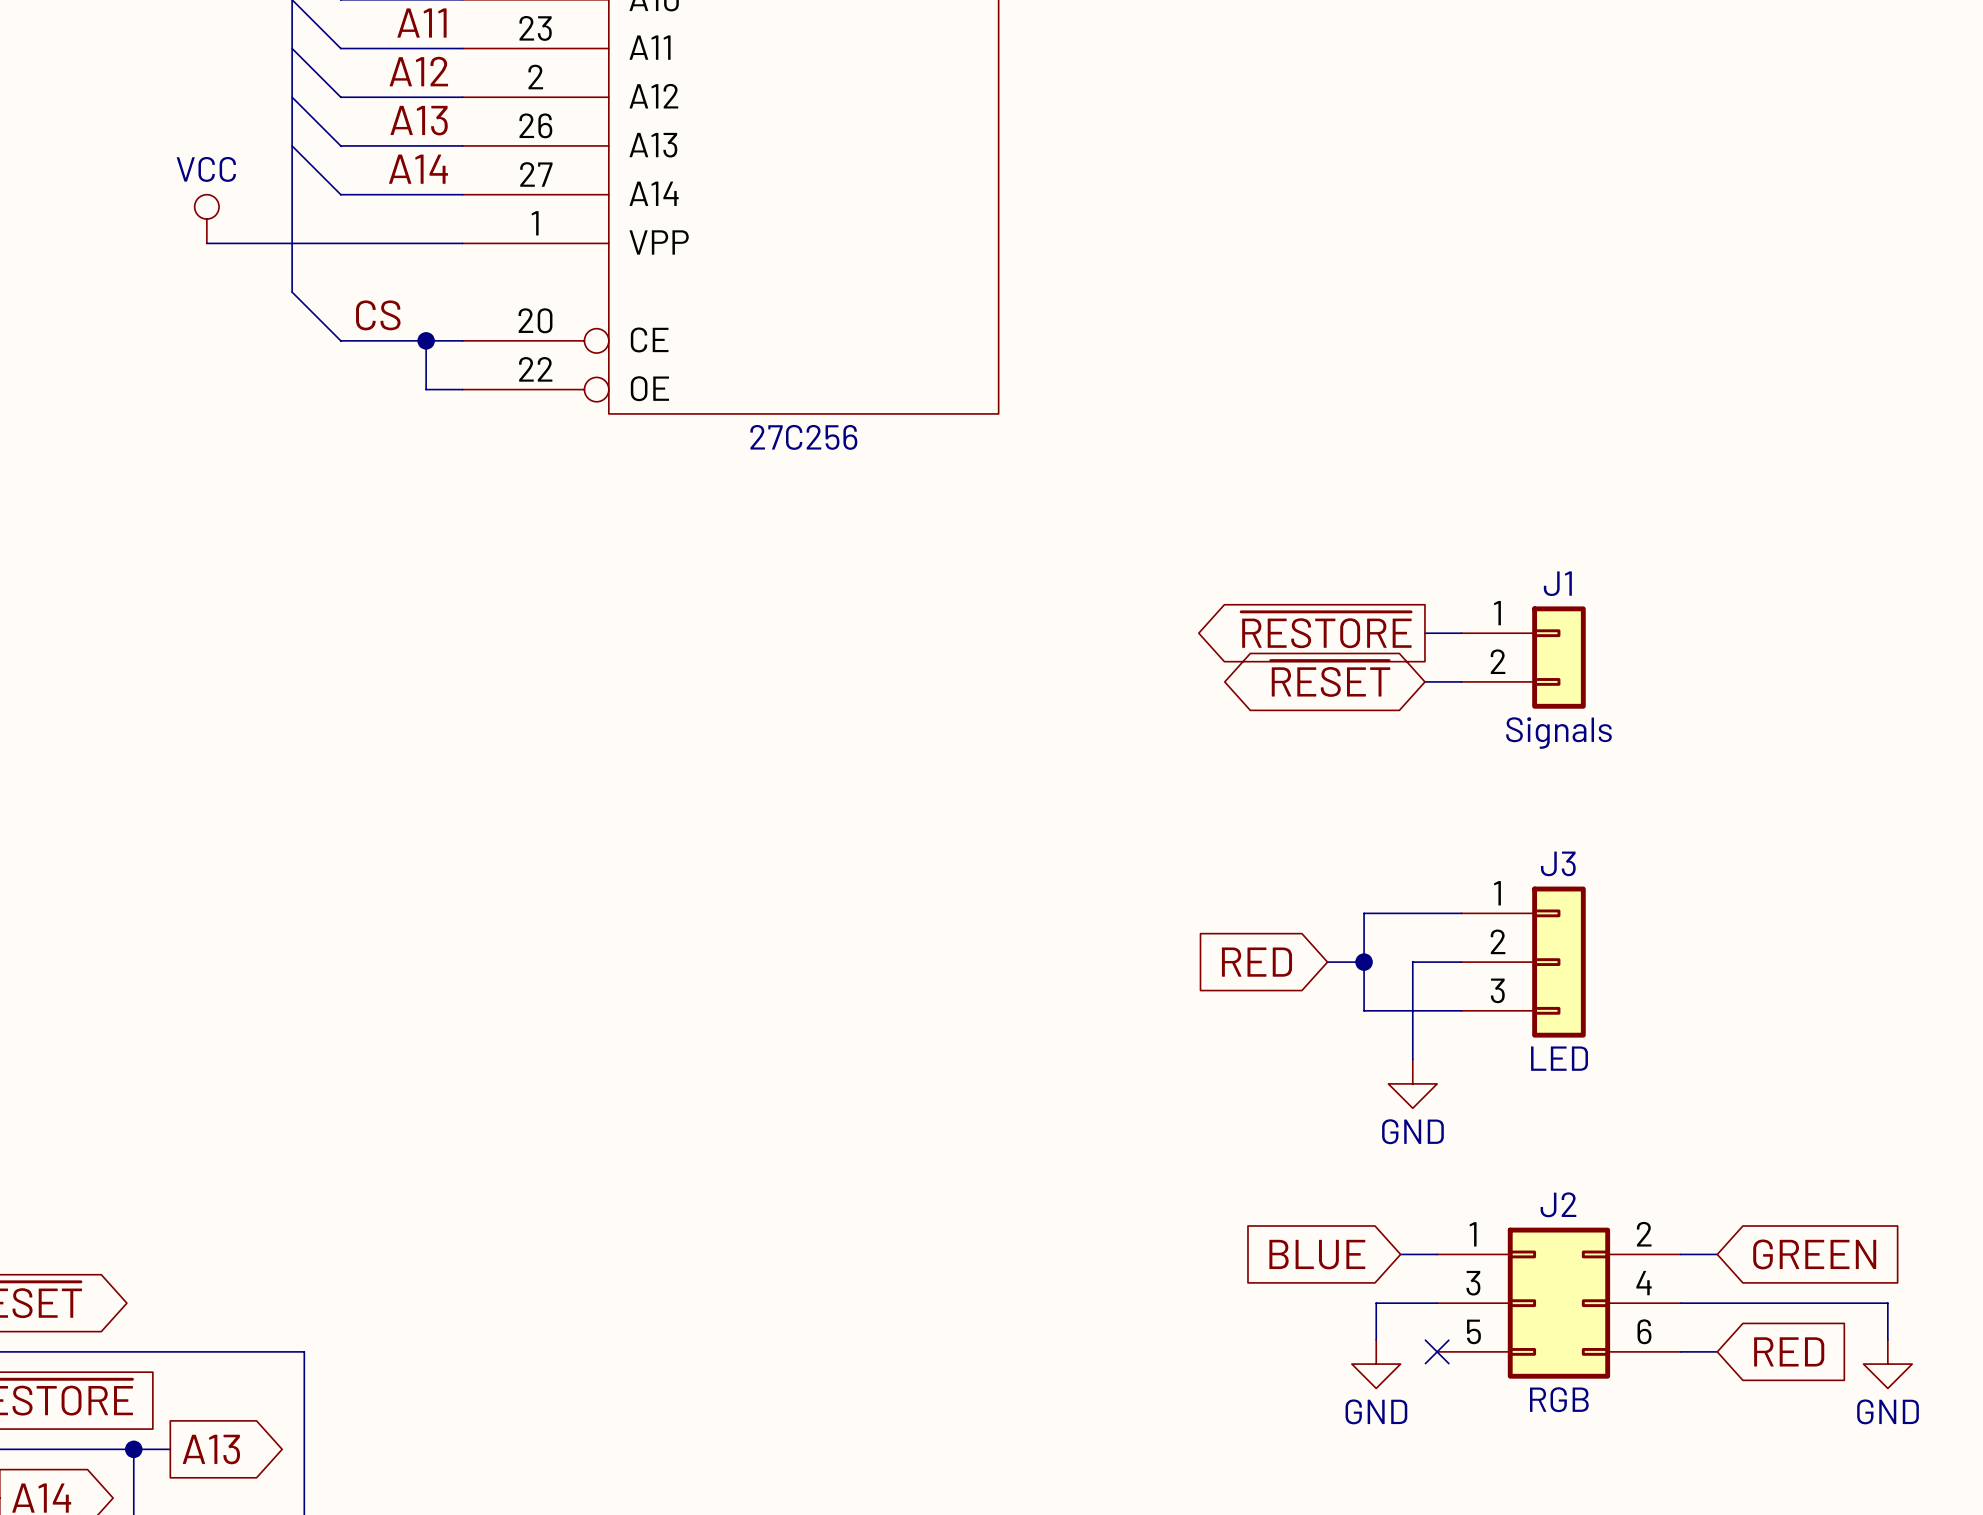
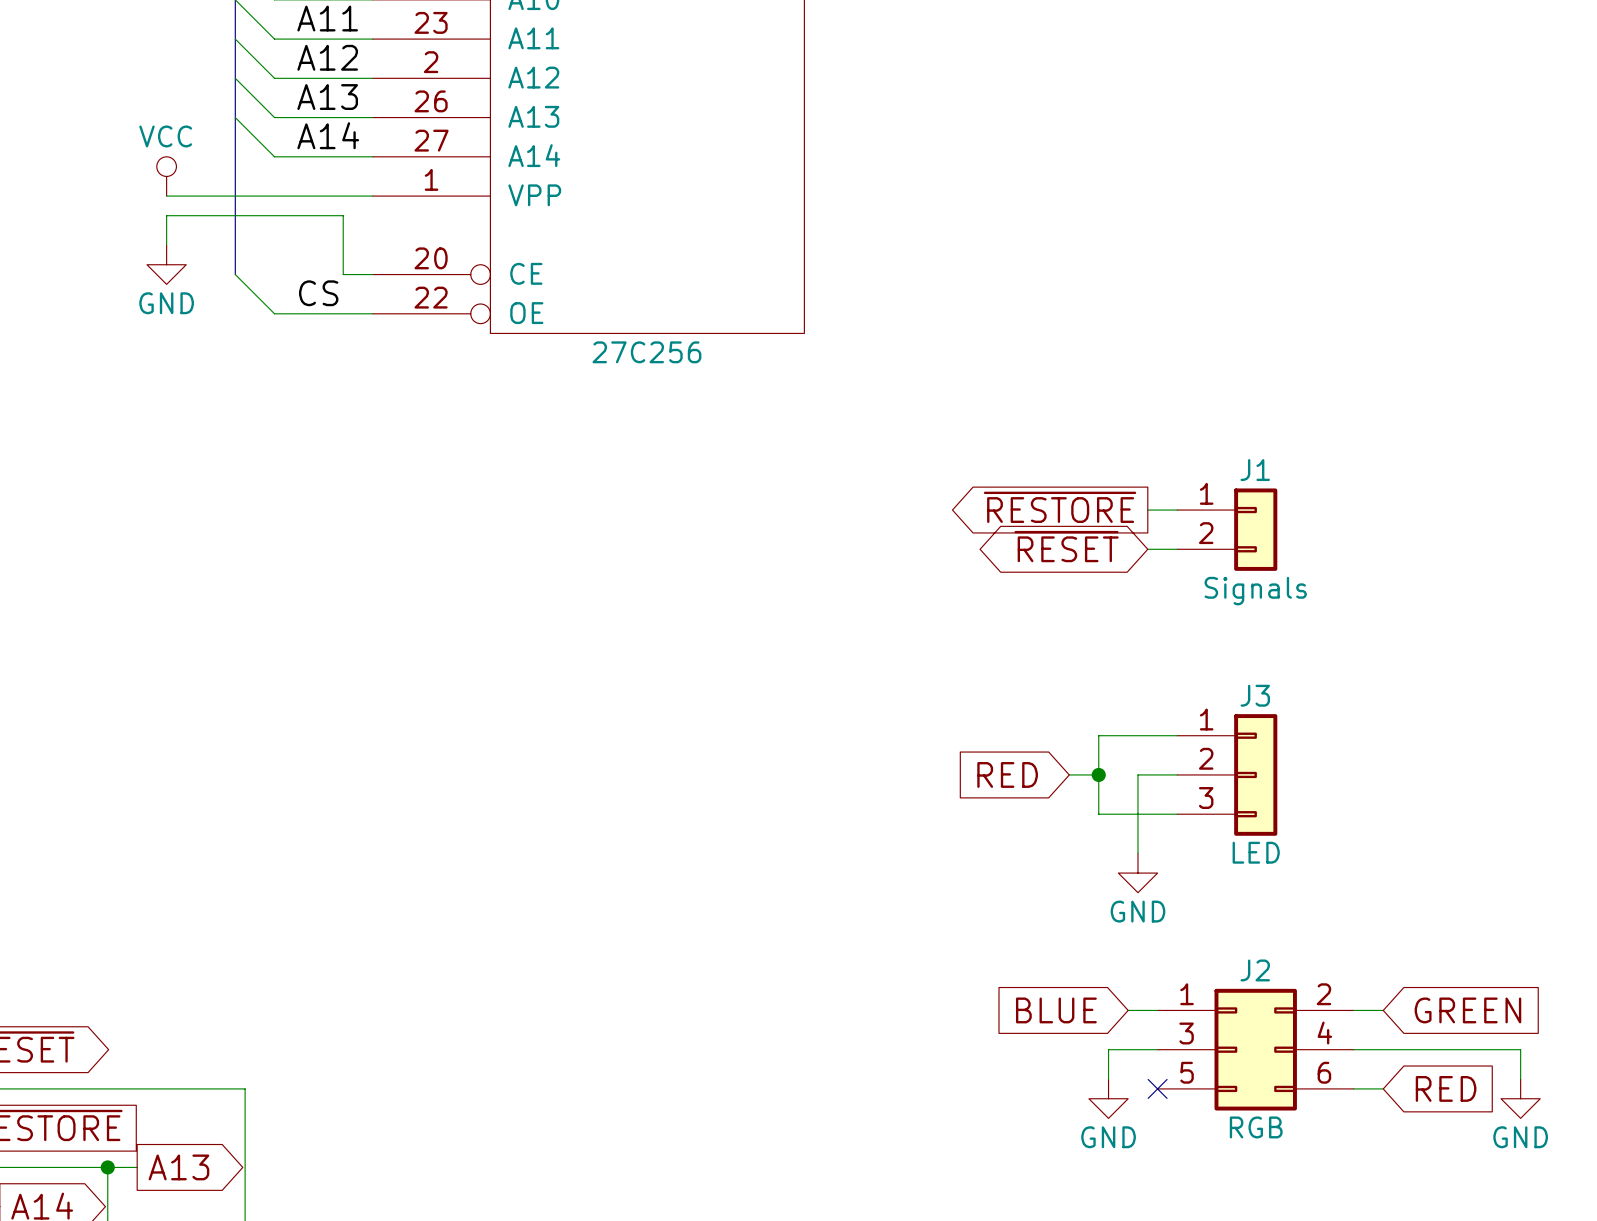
wire: (292, 292) (340, 340) (426, 340) (426, 389) -> (235, 274) (274, 313) (343, 313)
bus: none -> (235, 235) (235, 274)
wire: none -> (166, 245) (166, 215) (343, 215) (343, 274)
label position: CS (378, 315) -> CS (318, 293)
power symbol: none -> GND (166, 264)
junction: (426, 340) -> none

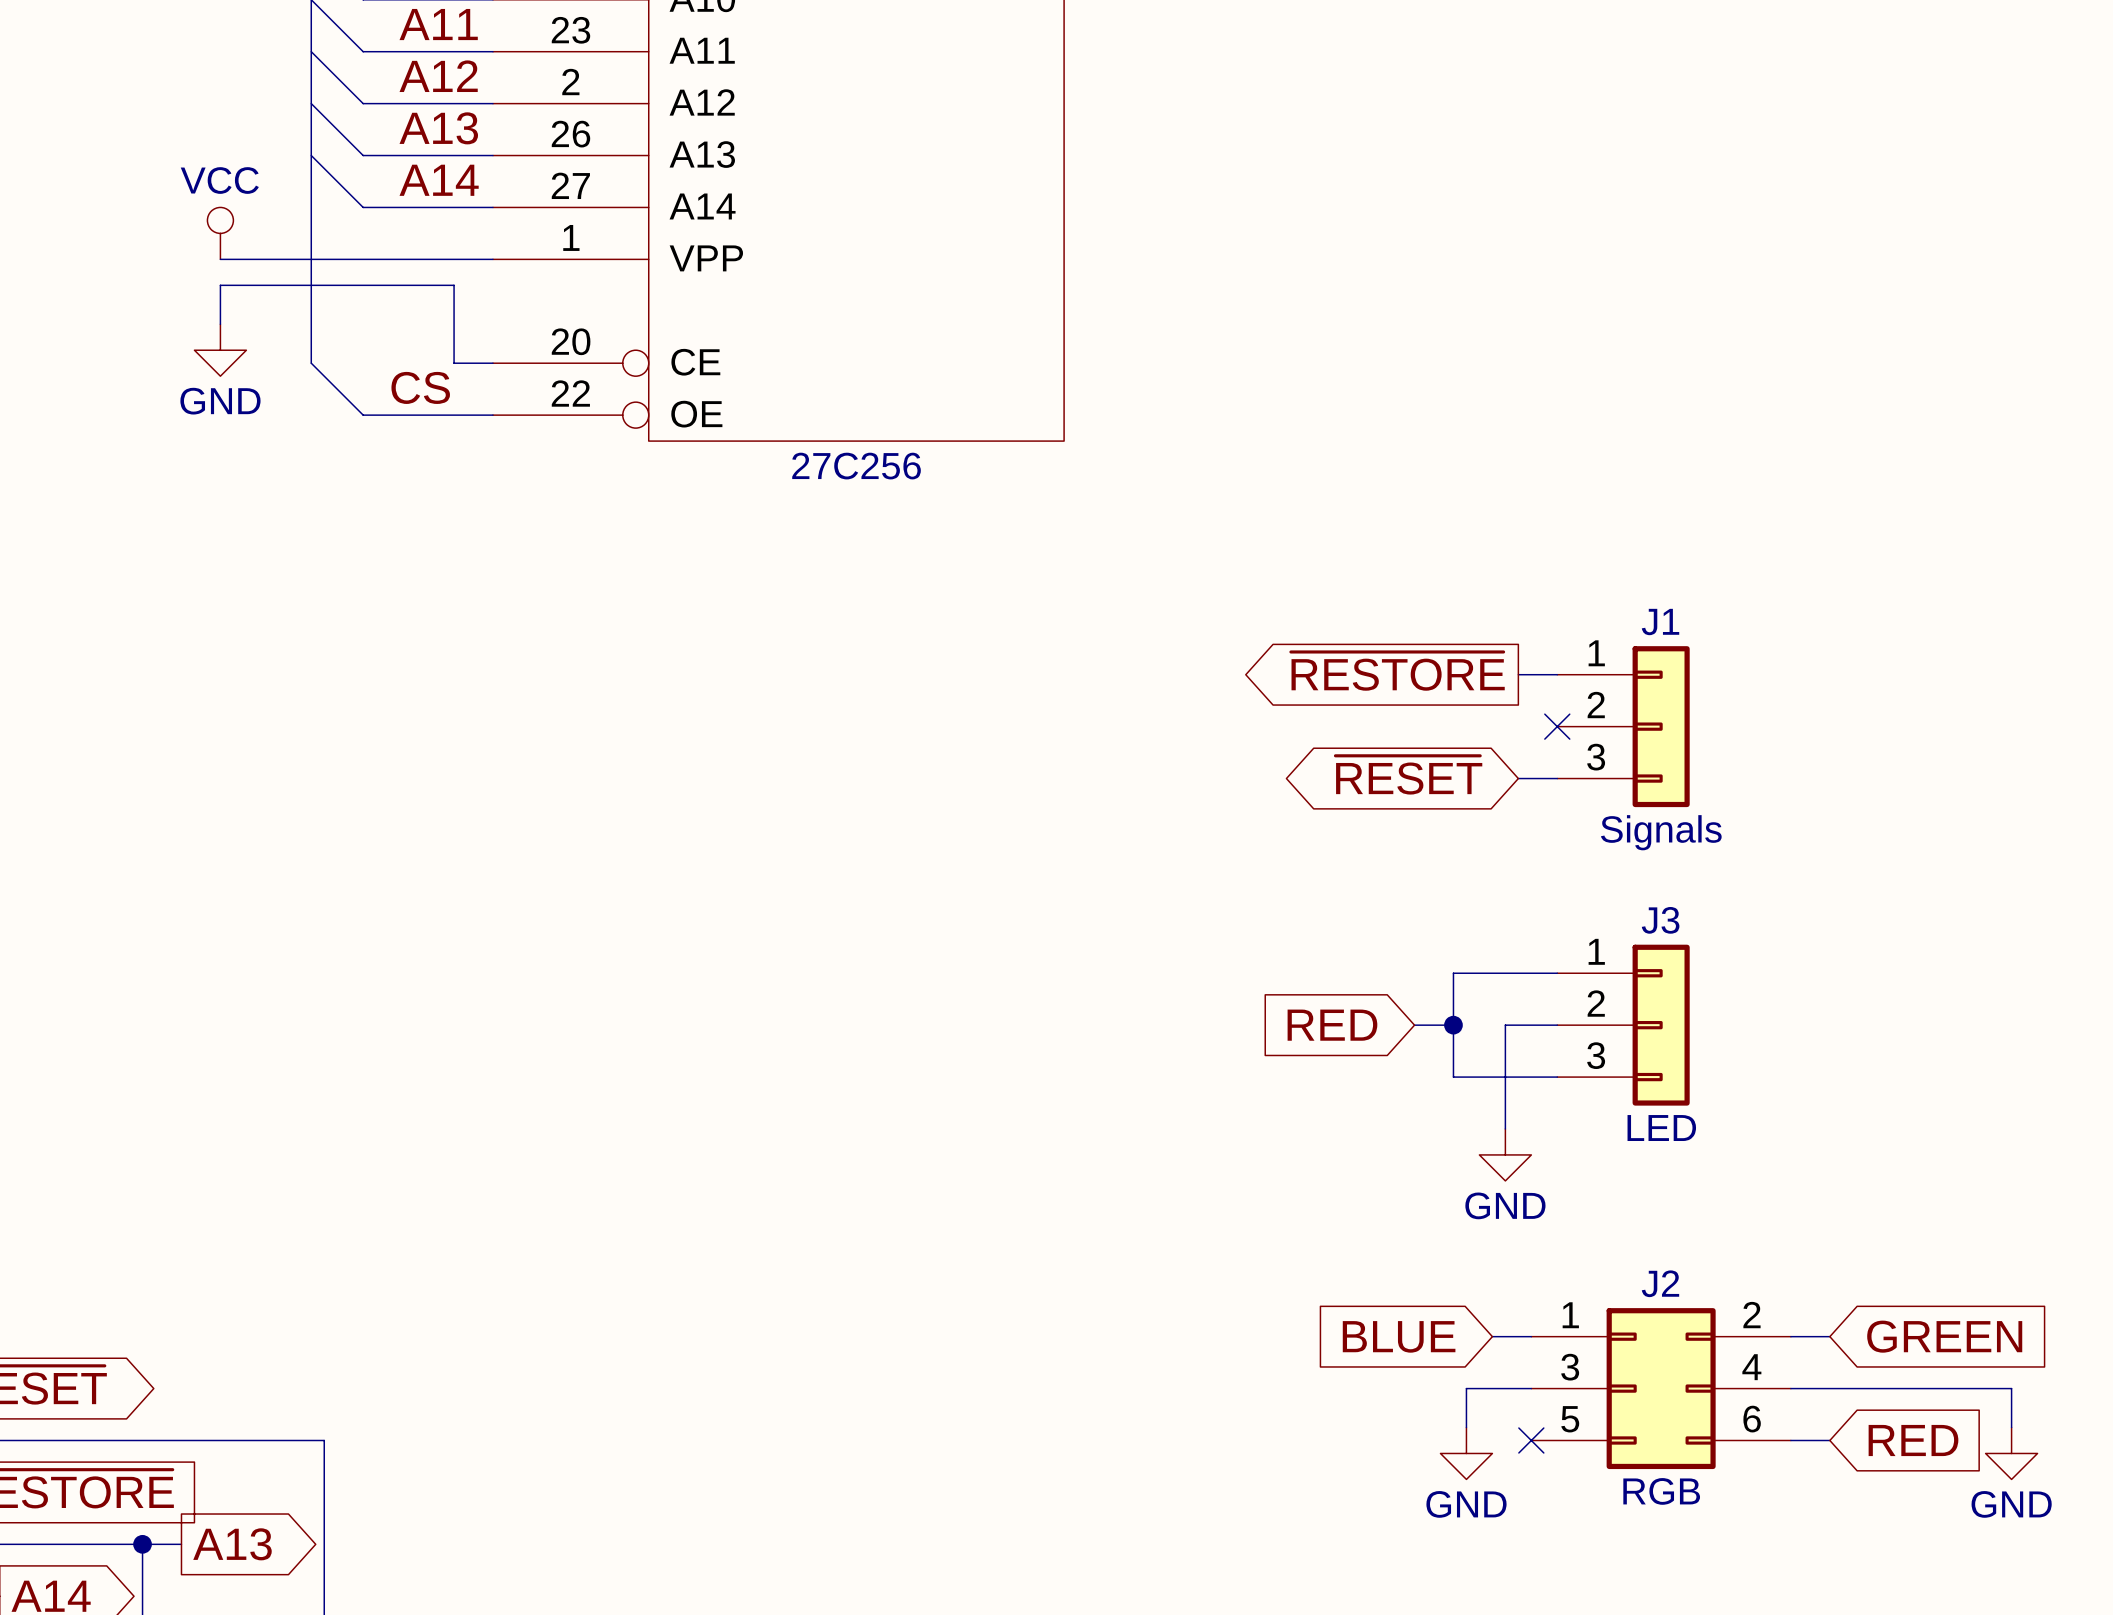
J1 symbol: [1177, 488, 1278, 571] -> [1557, 646, 1690, 808]
global label position: ~{RESET} (1066, 546) -> ~{RESET} (1408, 775)
wire: (1147, 549) (1177, 549) -> (1518, 778) (1557, 778)
no-connect mark: none -> (1557, 726)

